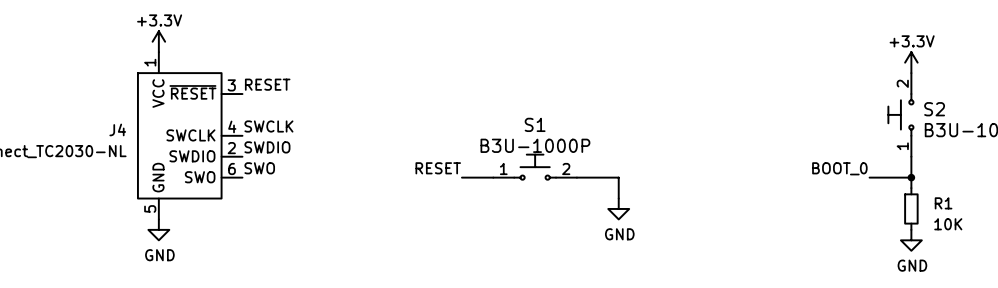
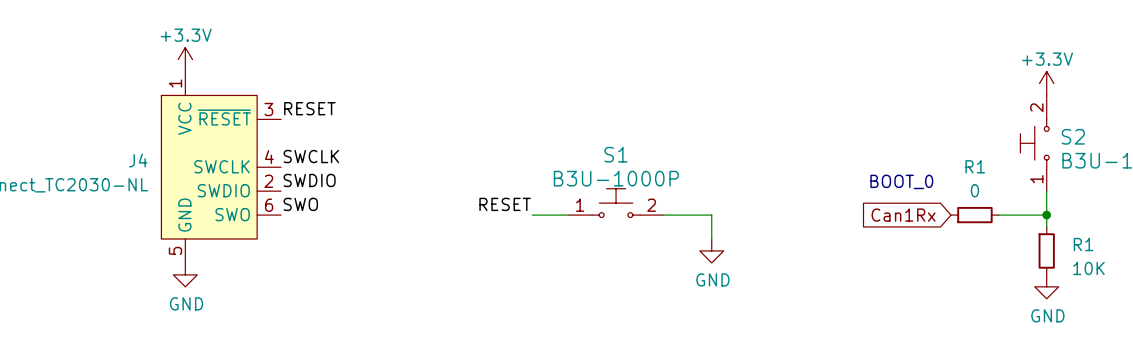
text: none -> BOOT_0 (901, 181)
label: BOOT_0 (839, 168) -> none
global label: none -> Can1Rx (903, 215)
R1: none -> 0 (974, 215)

